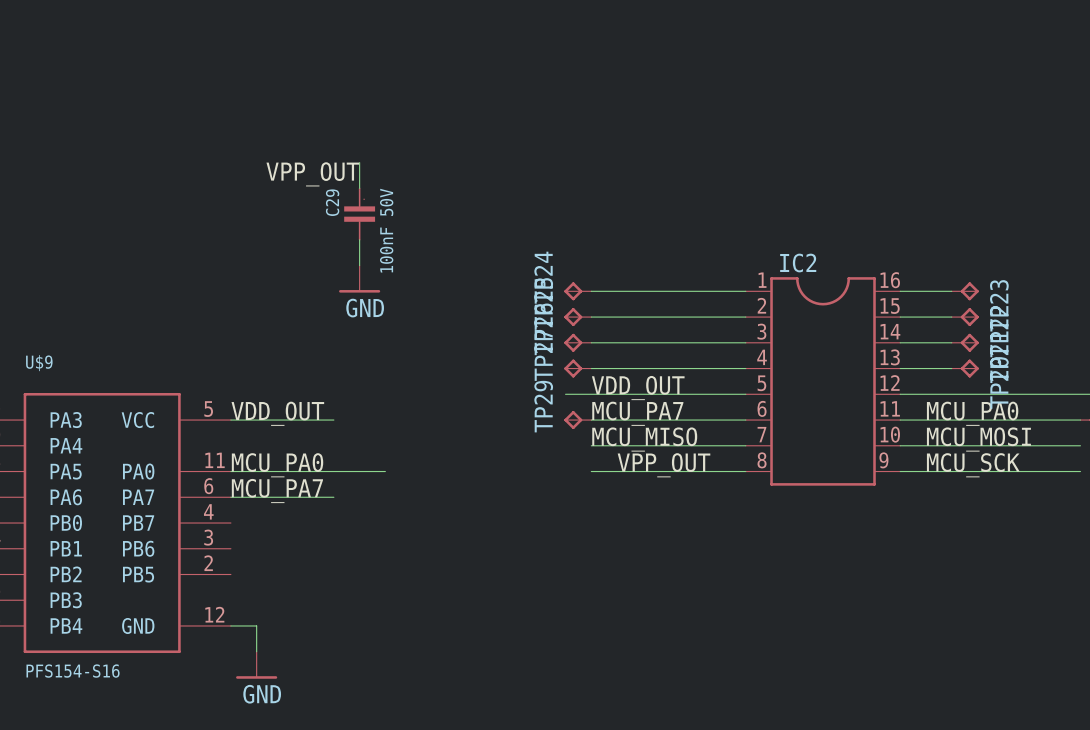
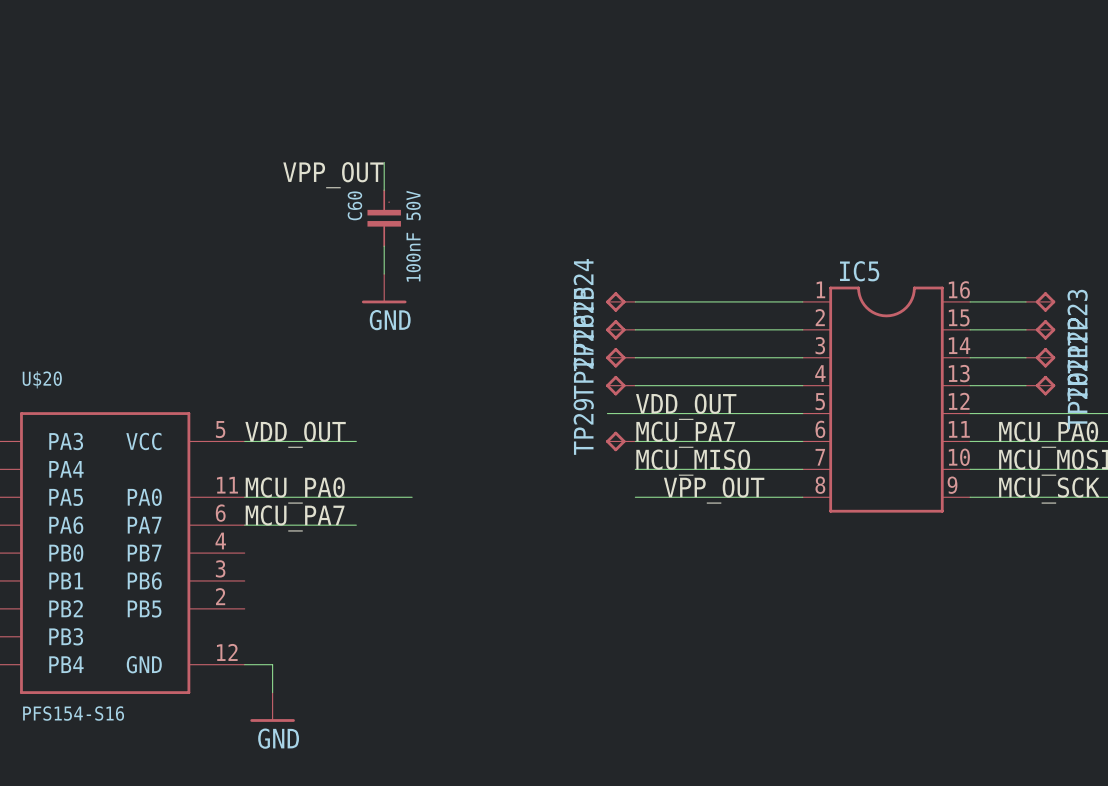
C29 name: C29 (332, 202) -> C60 (354, 205)
IC2 name: IC2 (798, 263) -> IC5 (859, 271)
U$9 name: U$9 (39, 363) -> U$20 (42, 379)

